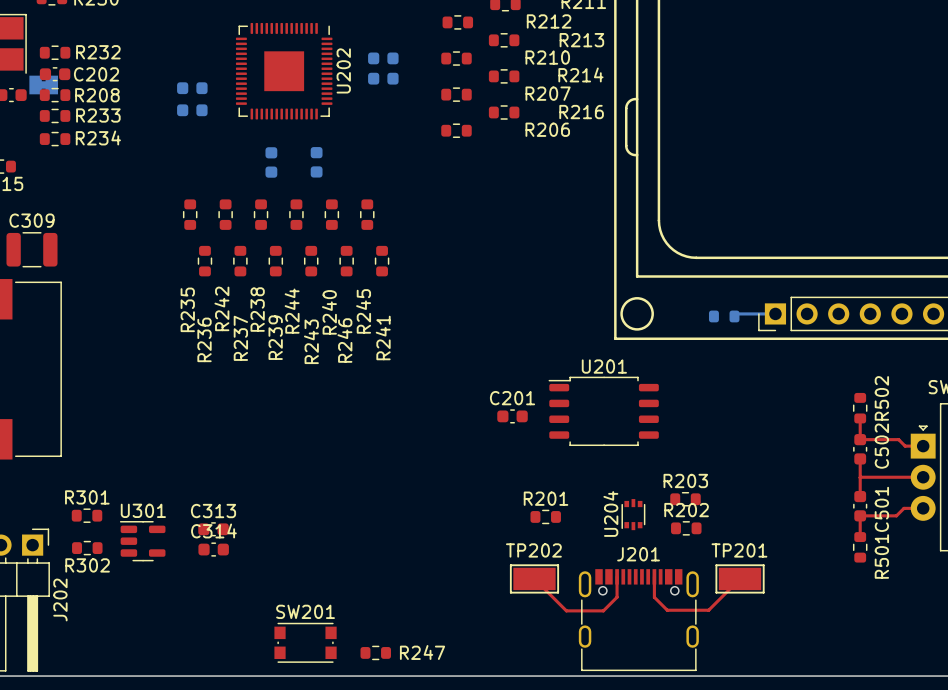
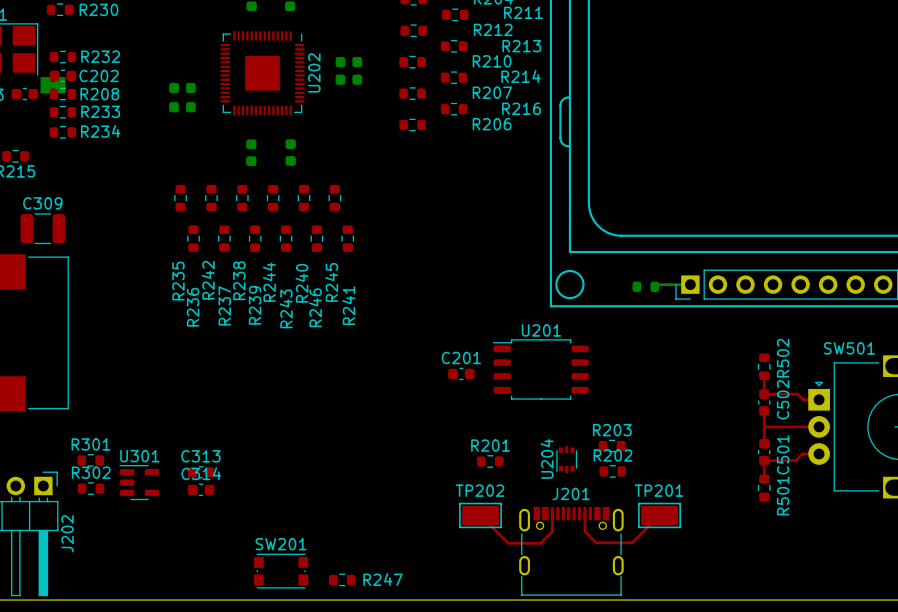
R302 name position: R302 (87, 565) -> R302 (91, 472)

